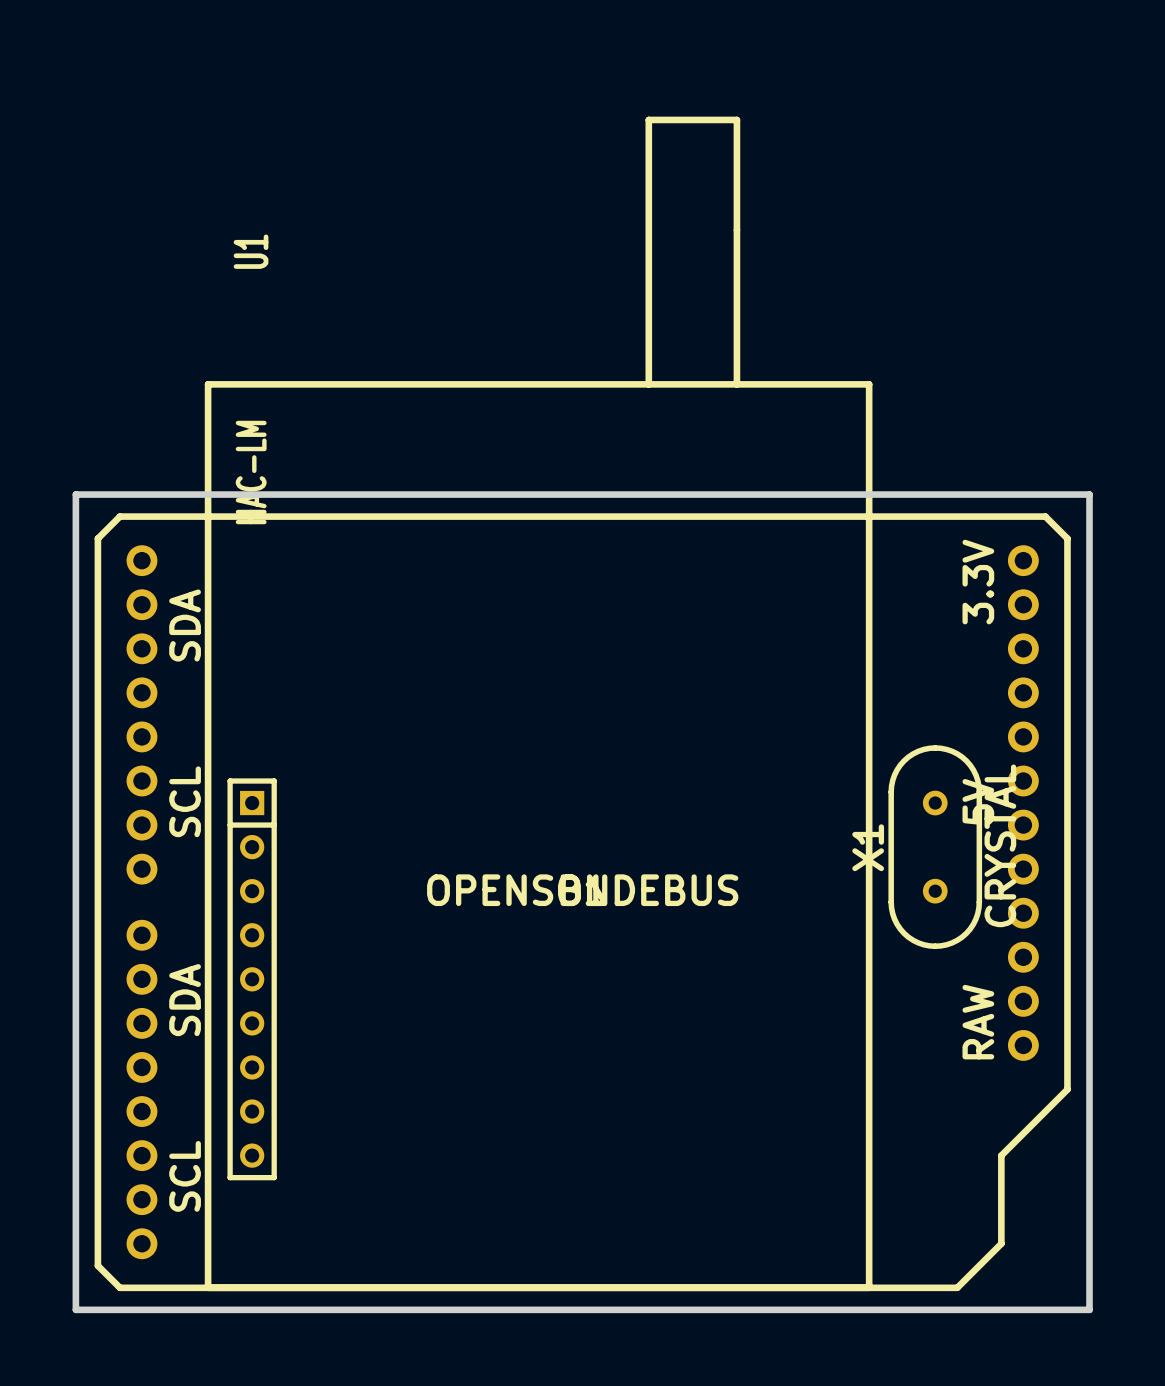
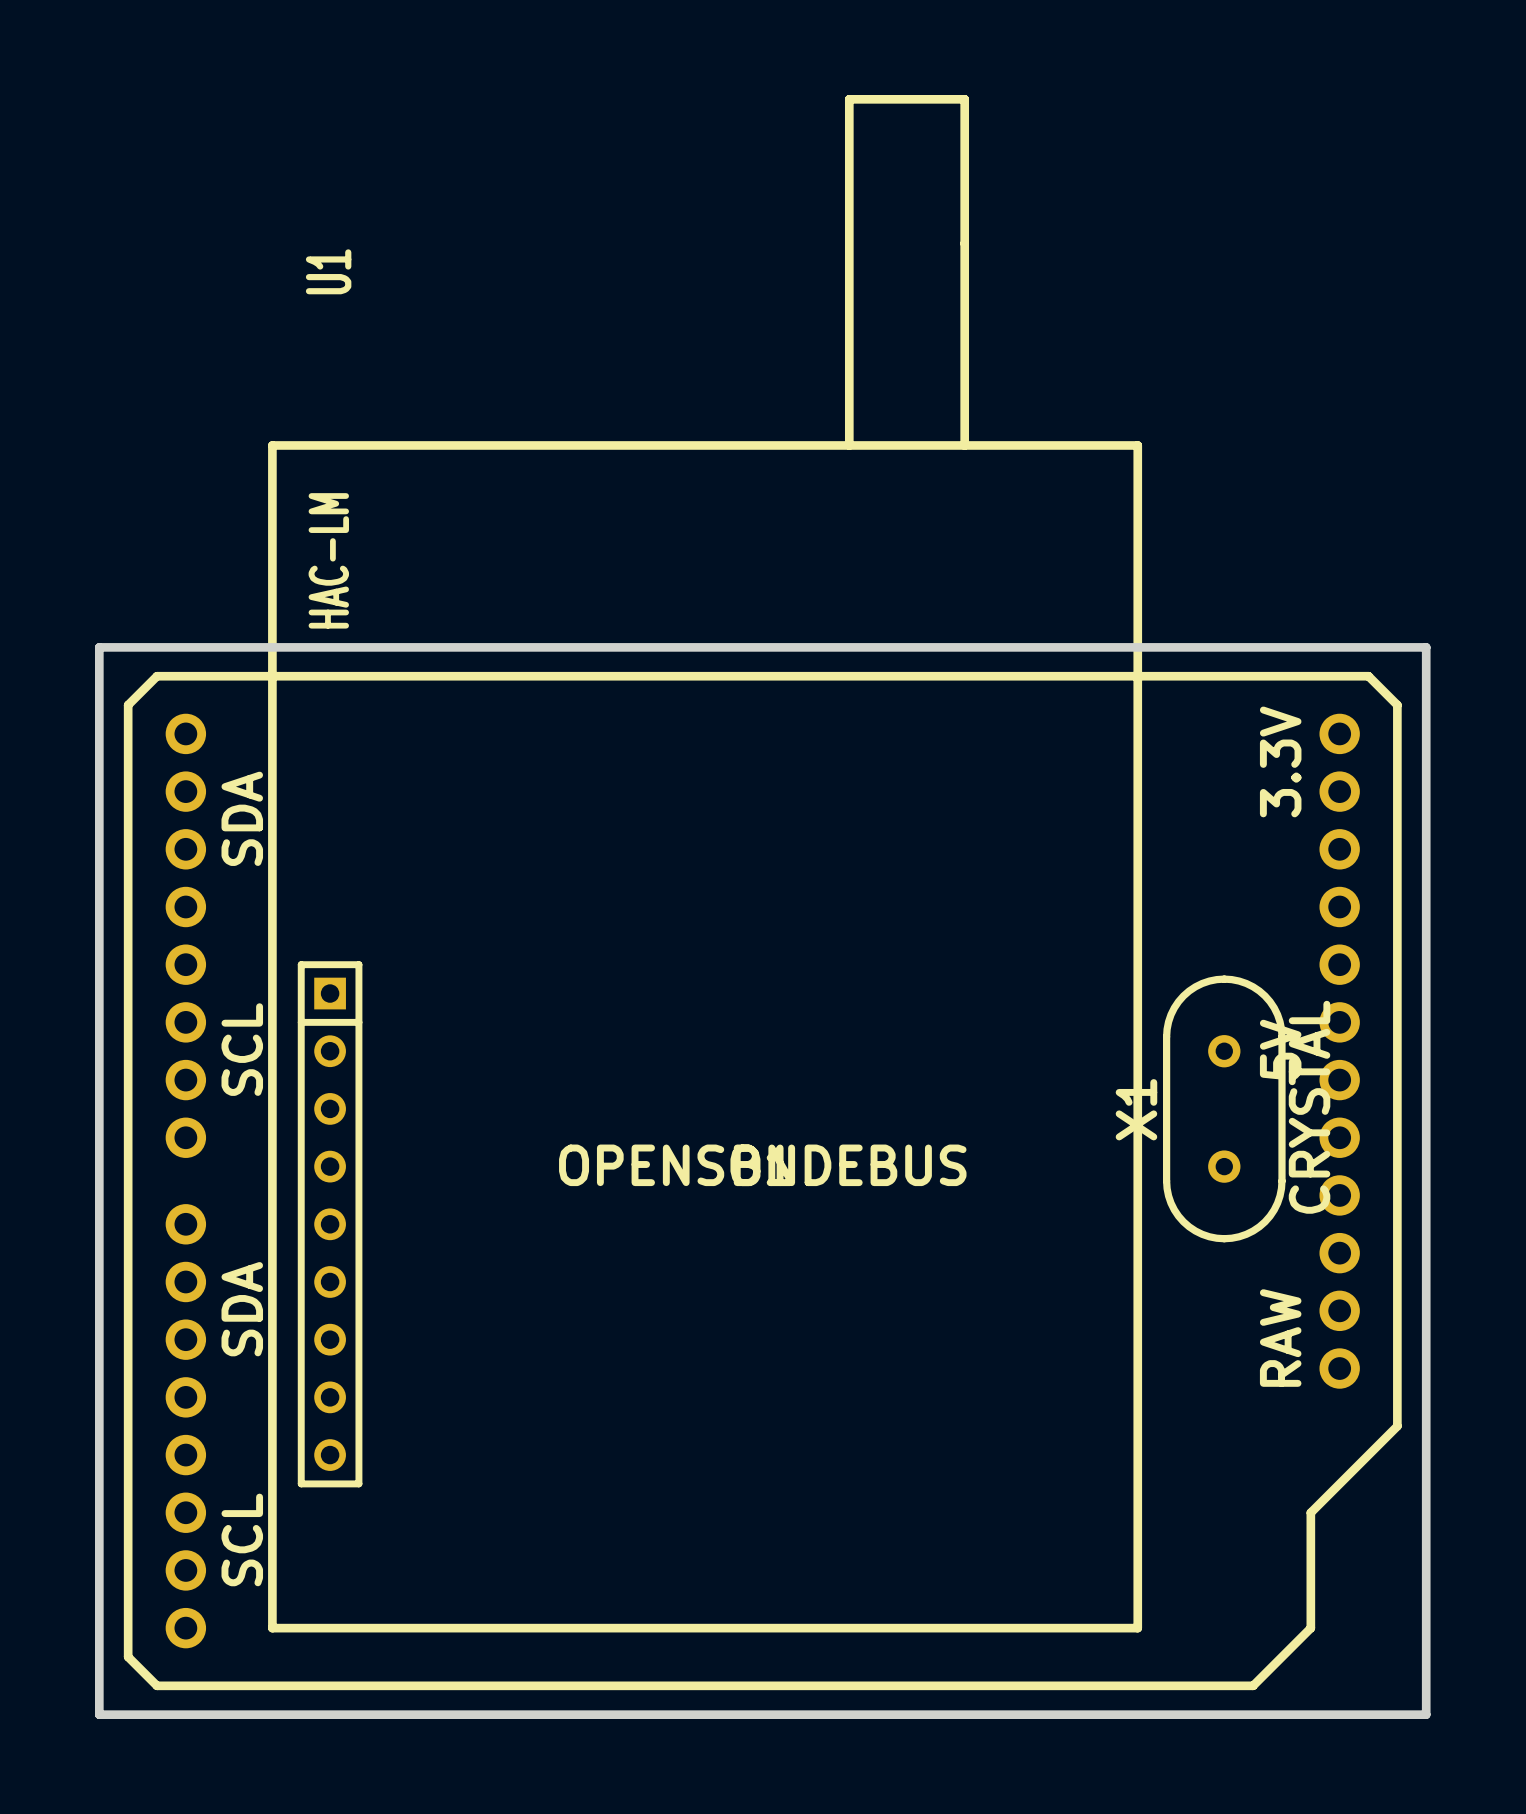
U1 position: (538, 703) -> (705, 863)

